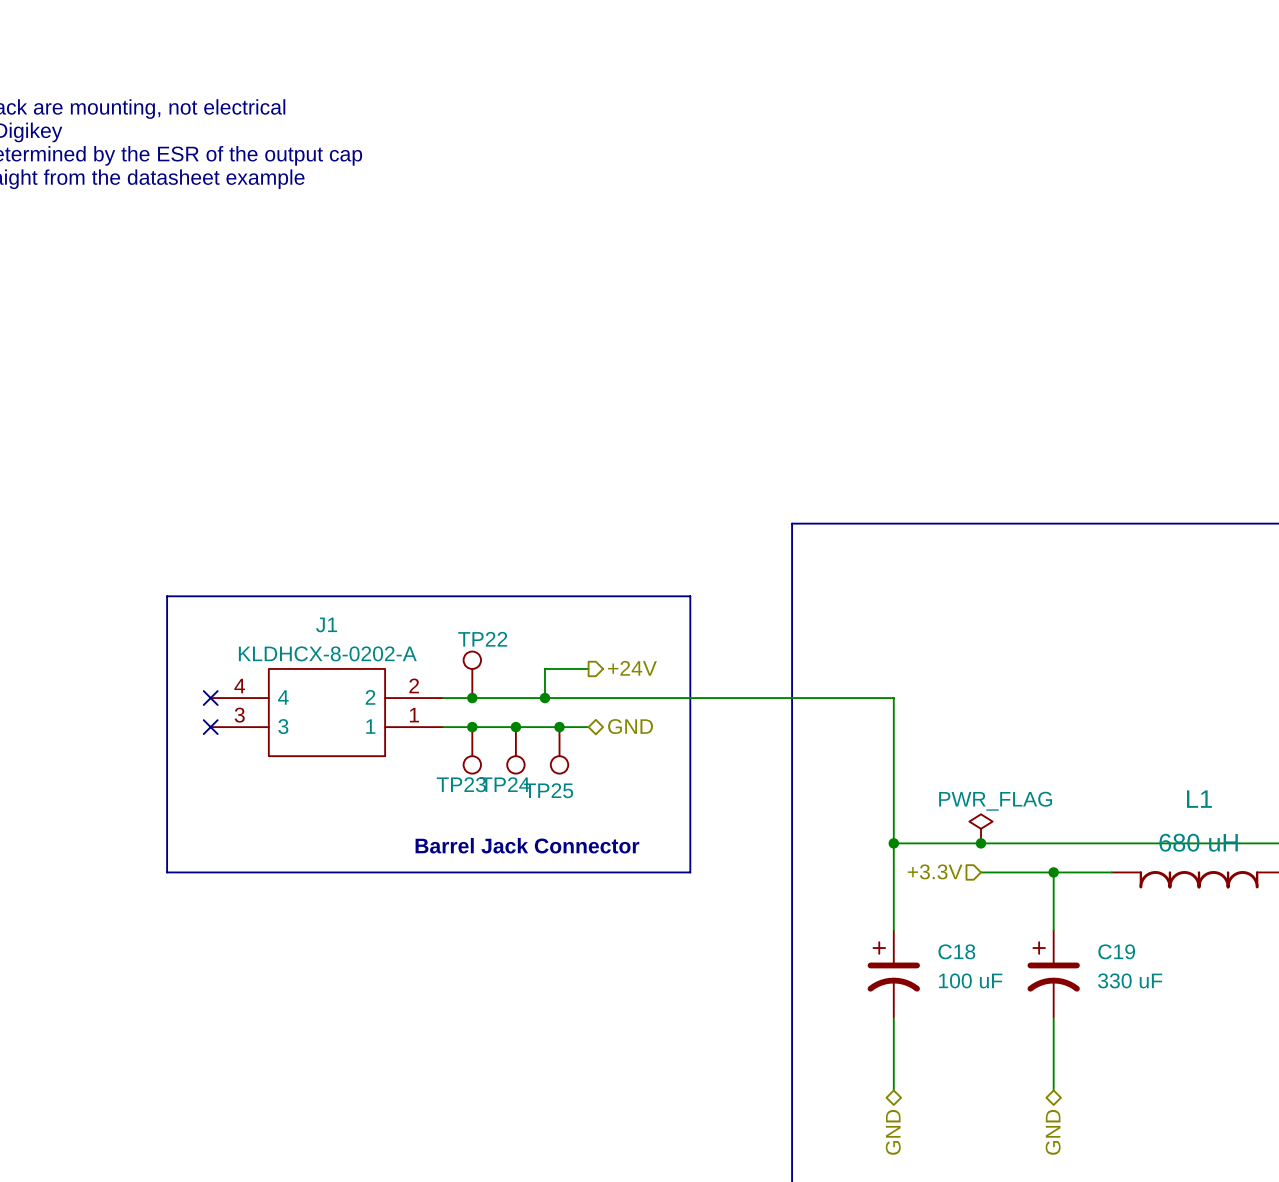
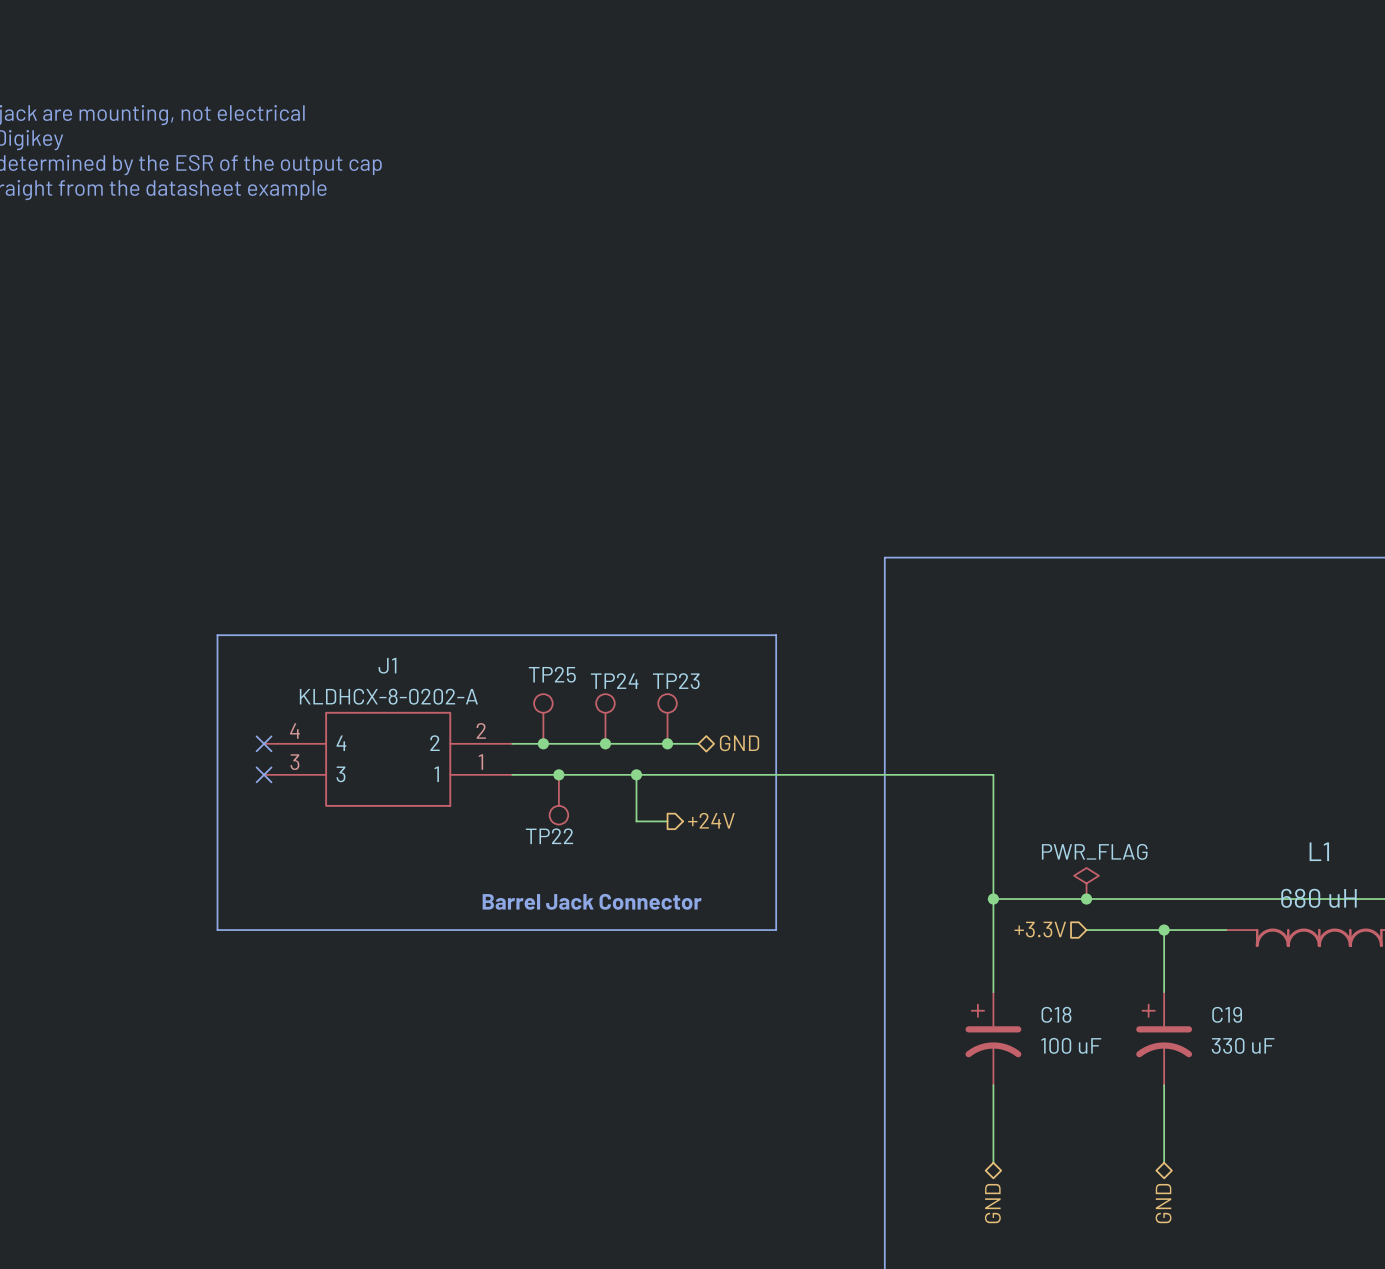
TP22 name: TP22 (482, 639) -> TP25 (552, 674)
wire: (588, 668) (544, 668) (544, 698) -> none
hierarchical label position: +24V (632, 668) -> +24V (711, 820)
junction position: (544, 698) -> (605, 743)
junction: none -> (667, 743)
wire: (617, 698) (893, 698) (893, 727) -> (667, 774) (993, 774)
hierarchical label position: GND (630, 726) -> GND (739, 743)
junction: (472, 727) -> none
junction: none -> (558, 774)
junction: (515, 727) -> none
wire: none -> (636, 774) (636, 821) (667, 821)
TP23 position: (472, 750) -> (667, 718)
TP22: none -> (558, 799)
TP24 position: (515, 750) -> (605, 718)
TP25: (559, 750) -> none
TP23 rotation: 0° (472, 764) -> 180° (667, 703)
TP24 rotation: 0° (515, 764) -> 180° (605, 703)

